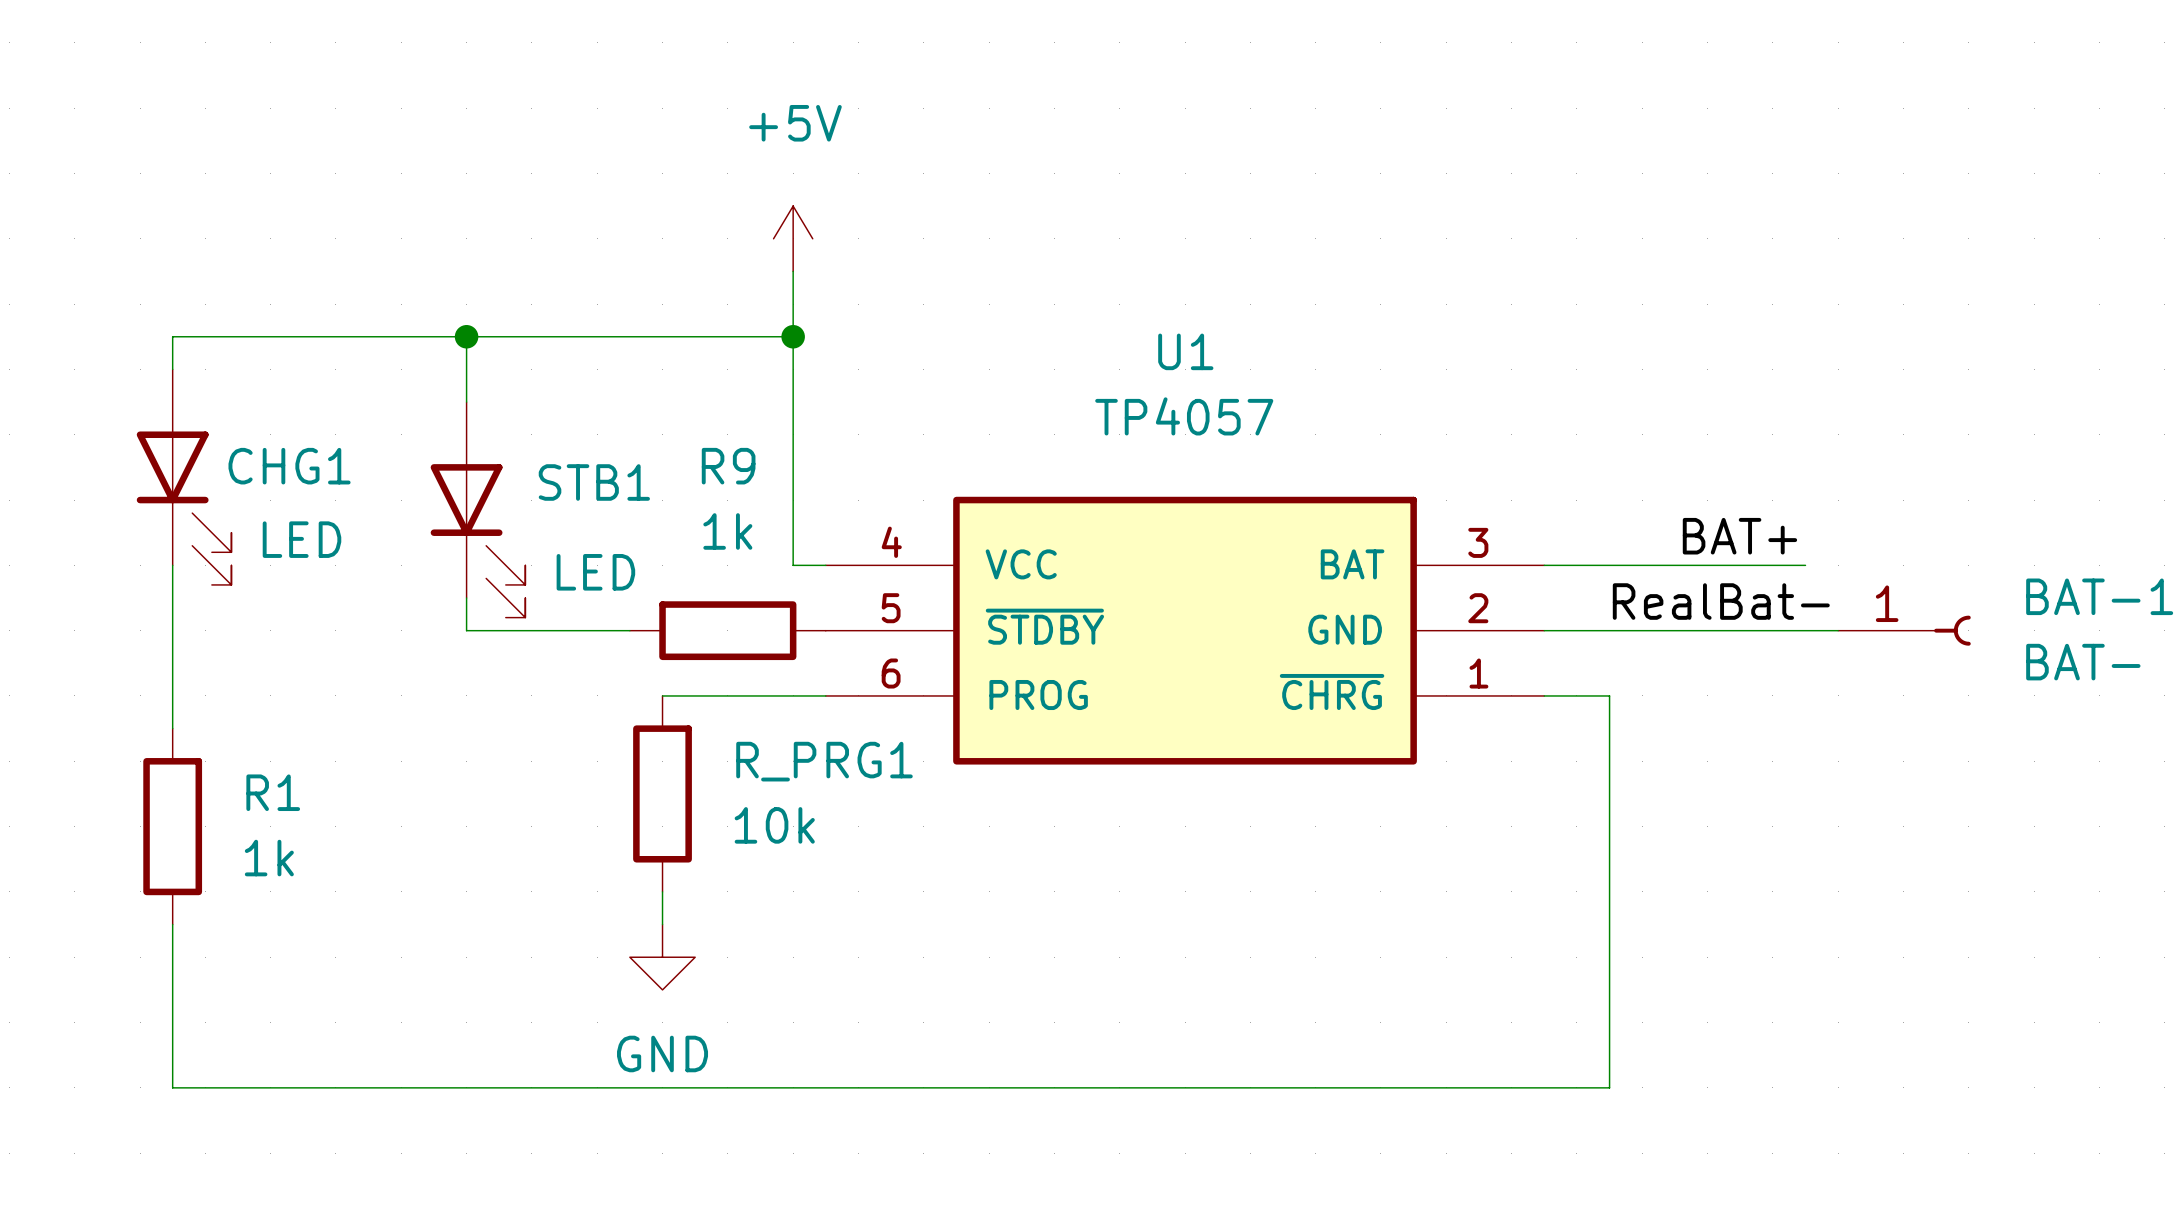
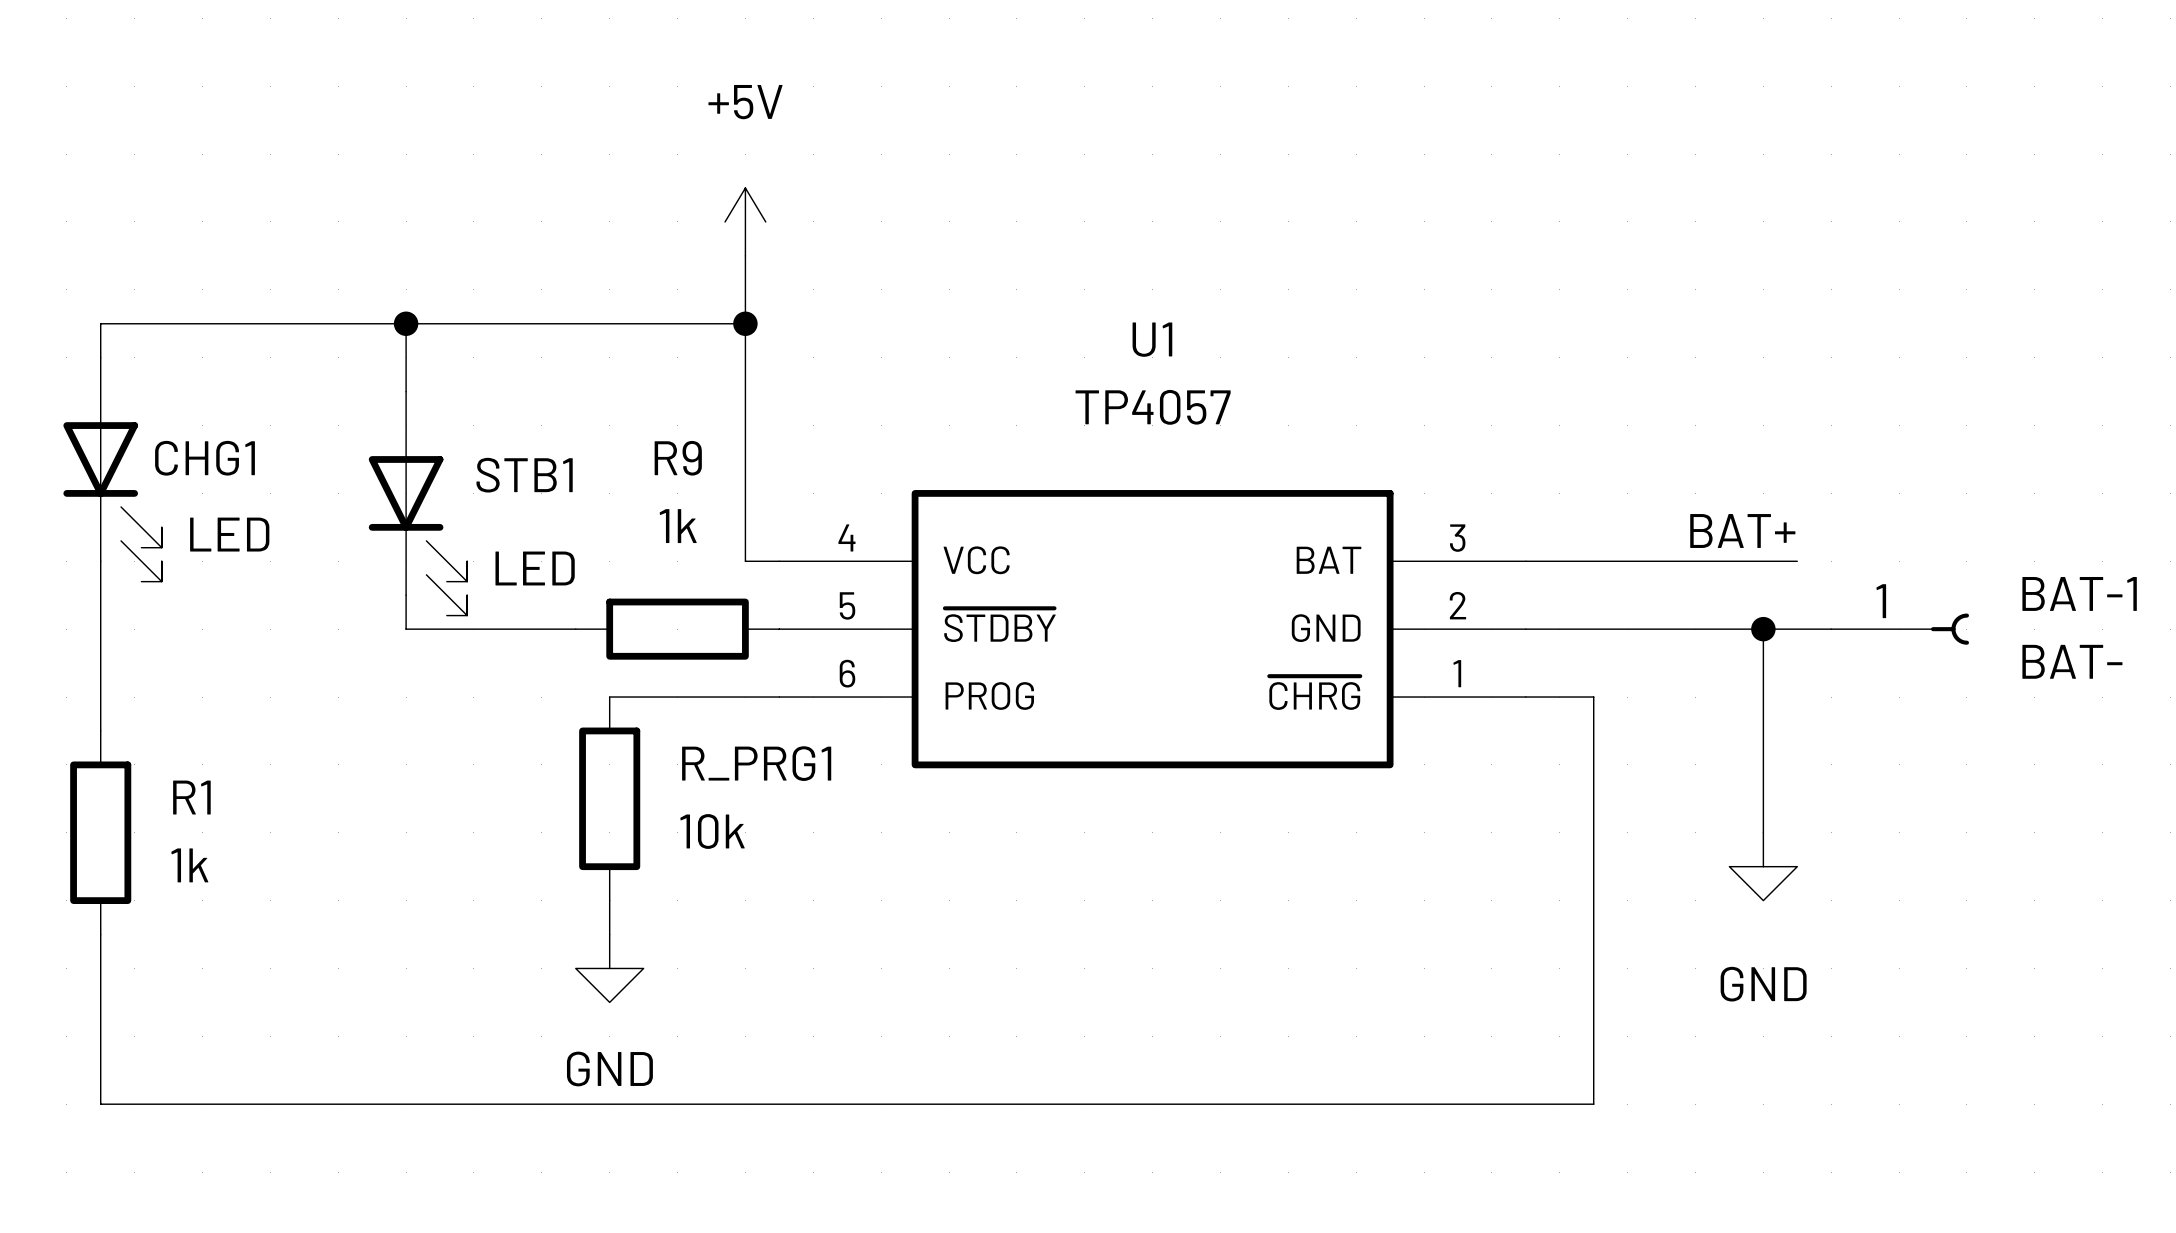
label: RealBat- (1721, 601) -> none
wire: none -> (1763, 629) (1763, 832)
junction: none -> (1763, 629)
power symbol: none -> GND (1763, 866)

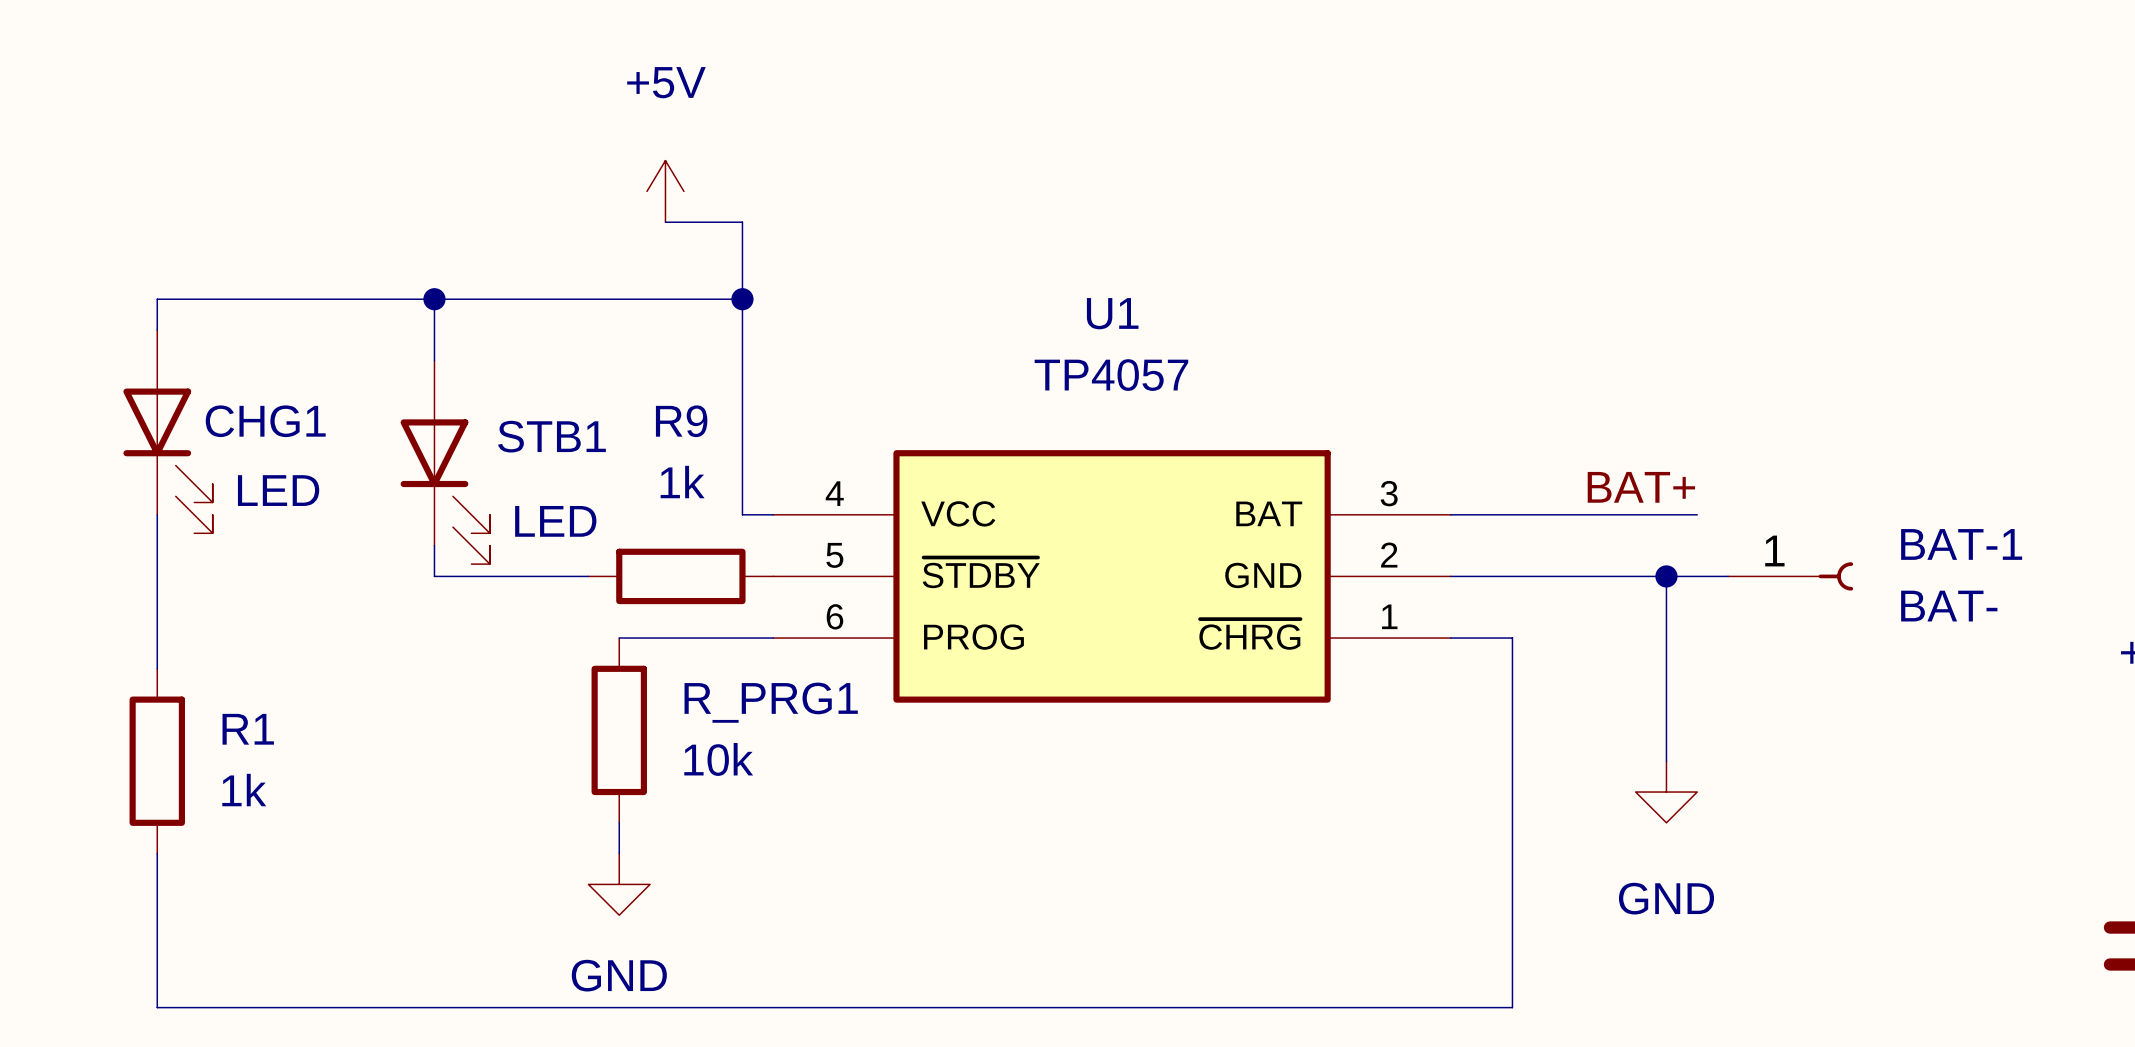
power symbol position: +5V (745, 221) -> +5V (665, 191)
wire: none -> (665, 222) (742, 222) (742, 237)

